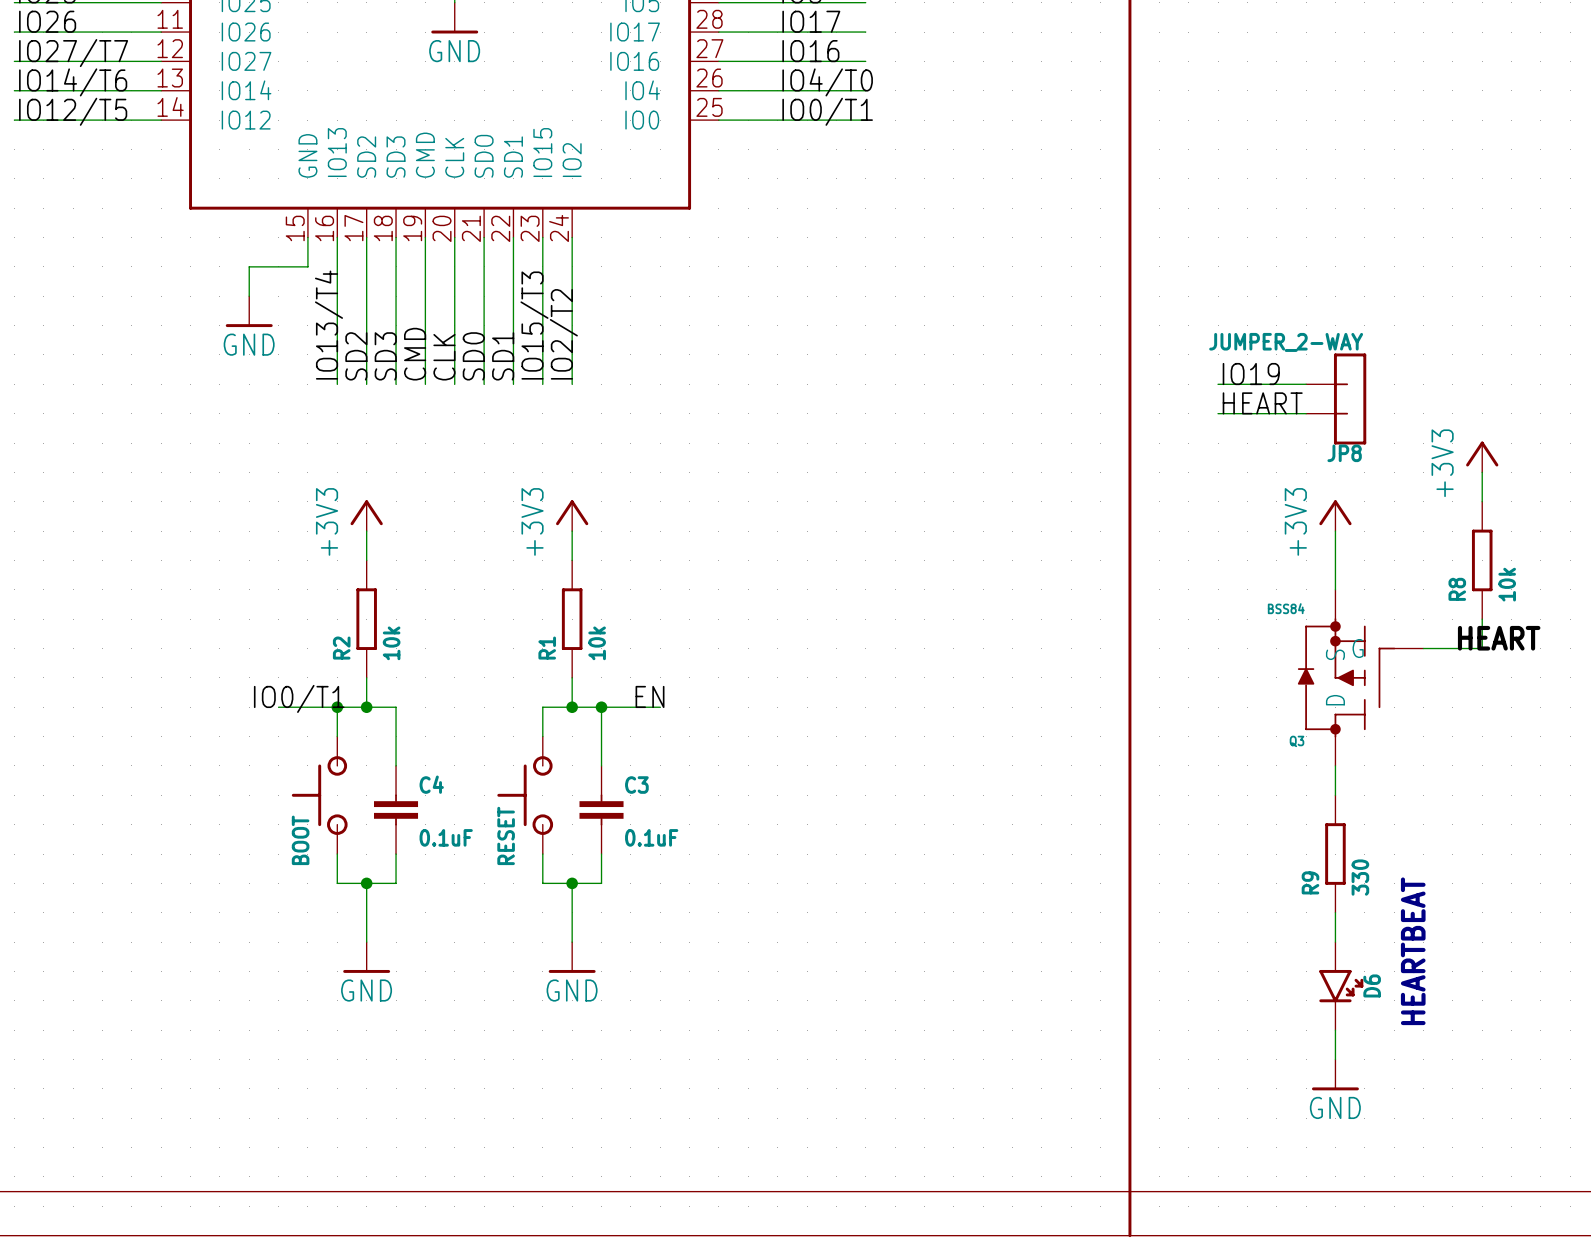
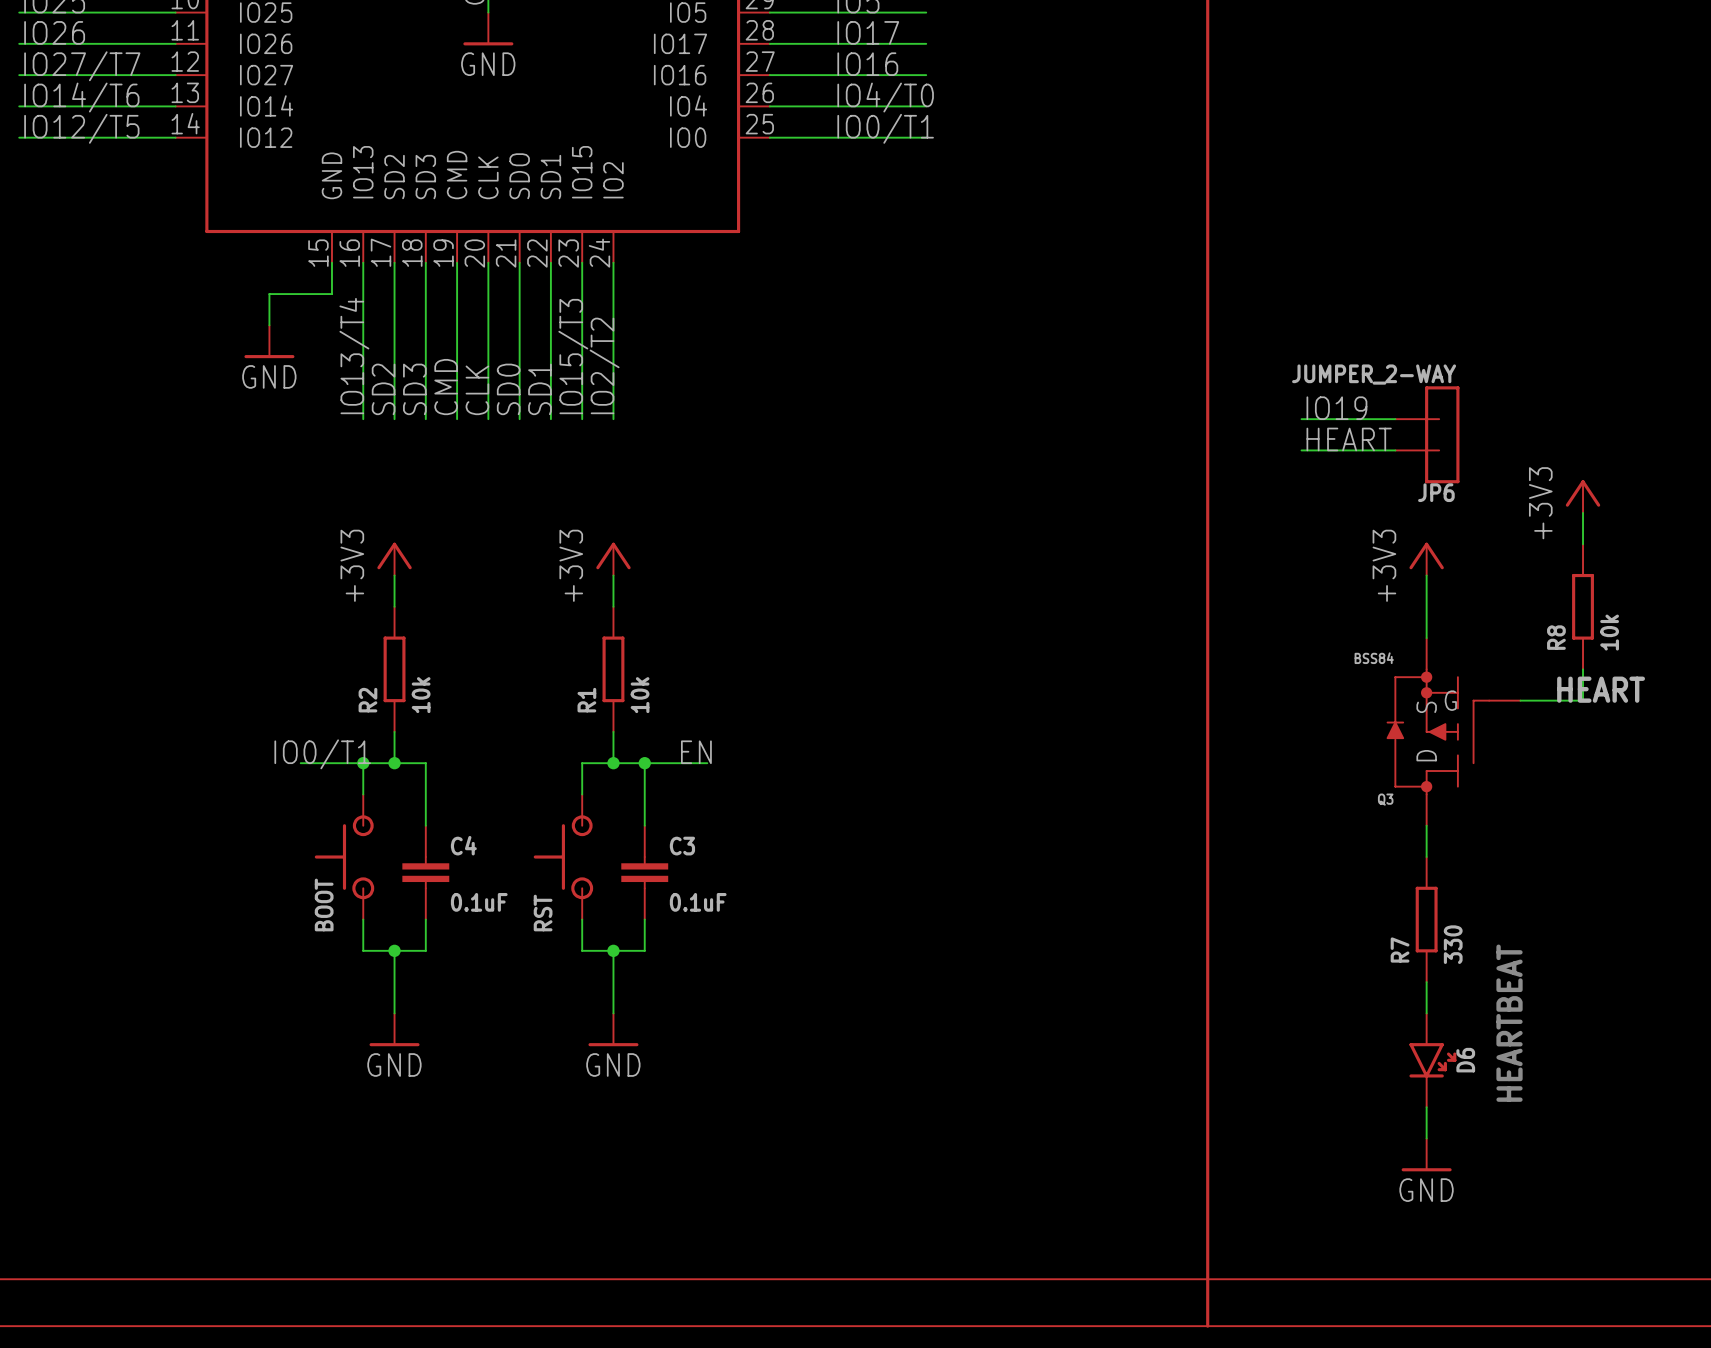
JP8 name: JP8 (1344, 453) -> JP6 (1436, 492)
RESET name: RESET (506, 835) -> RST (543, 913)
R9 name: R9 (1310, 882) -> R7 (1400, 950)

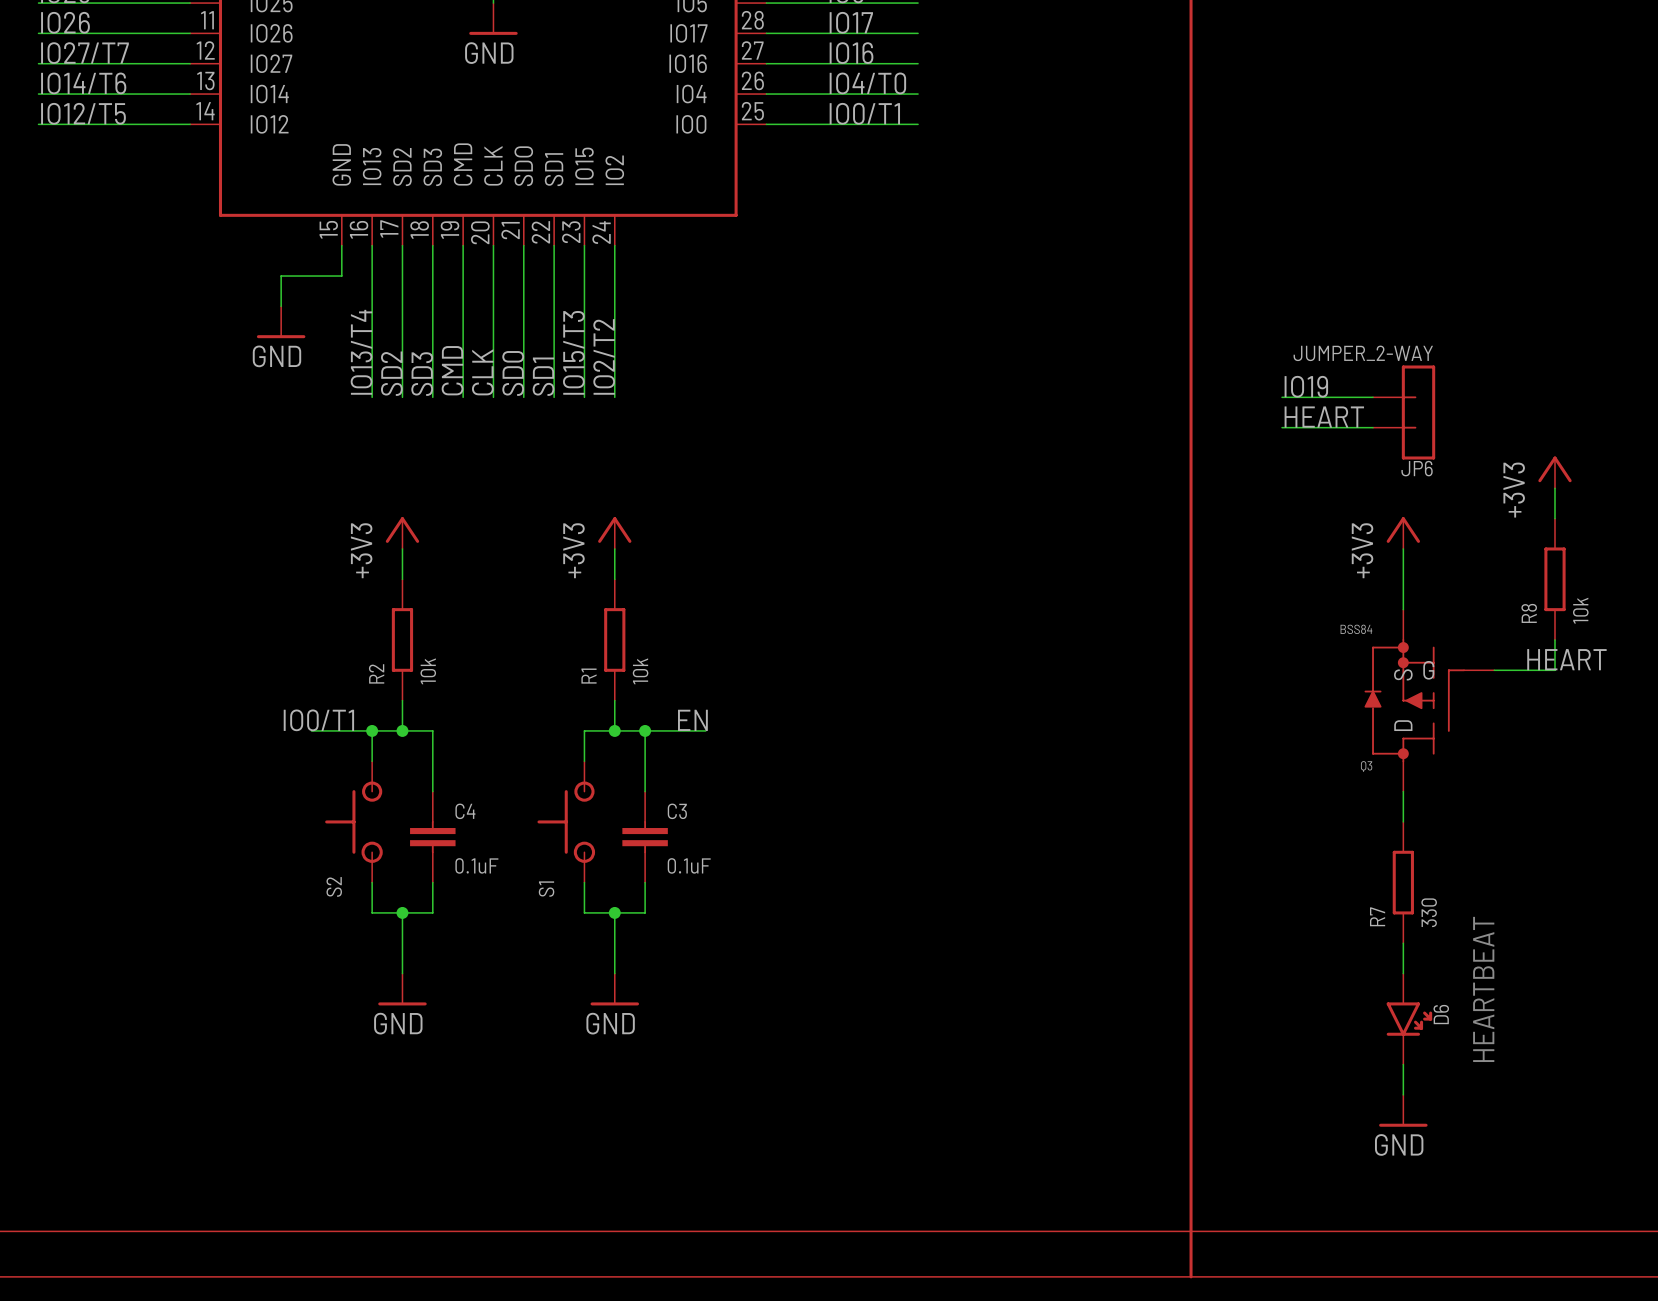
BOOT name: BOOT (324, 905) -> S2 (334, 886)
RST name: RST (543, 913) -> S1 (546, 889)

